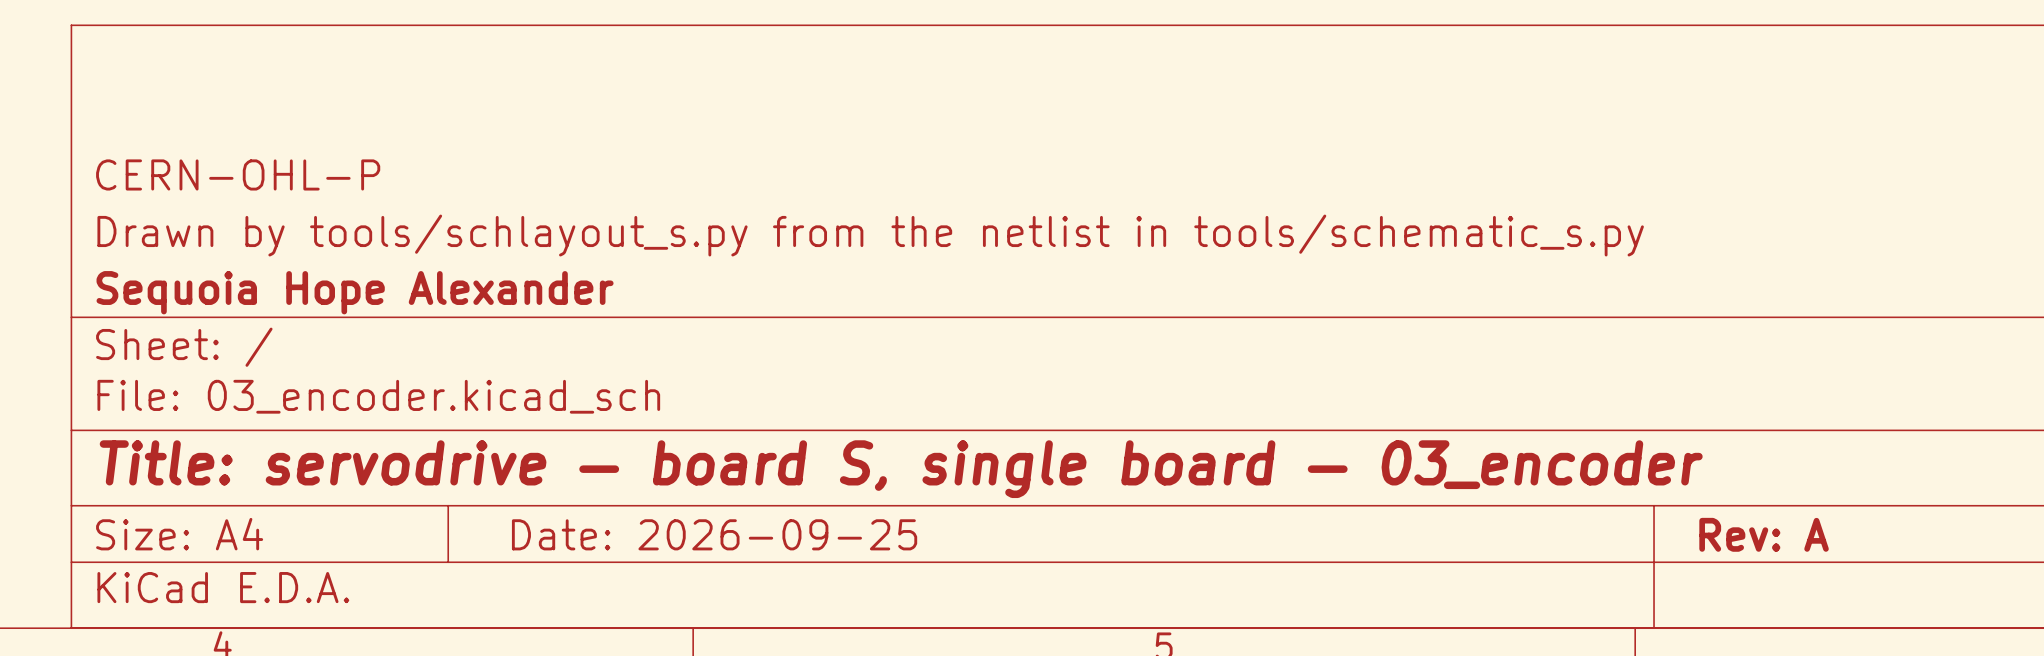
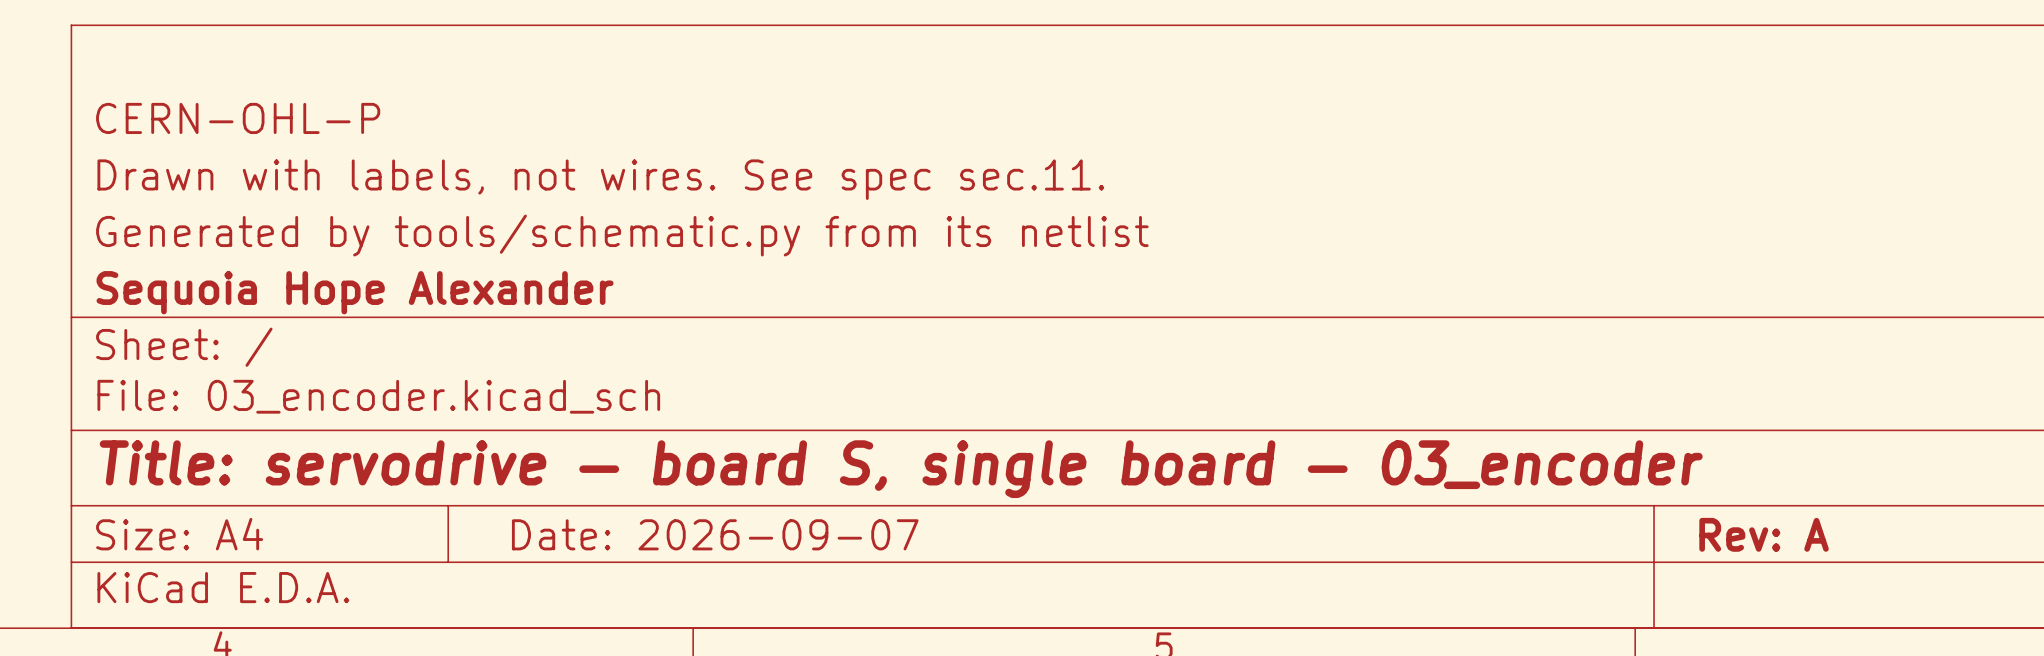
title block: none -> CERN-OHL-P (238, 118)
title block: CERN-OHL-P (238, 174) -> Drawn with labels, not wires. See spec sec.11. (600, 179)
title block: Drawn by tools/schlayout_s.py from the netlist in tools/schematic_s.py (870, 235) -> Generated by tools/schematic.py from its netlist (622, 235)
title block: Date: 2026-09-25 (714, 534) -> Date: 2026-09-07 (715, 534)

